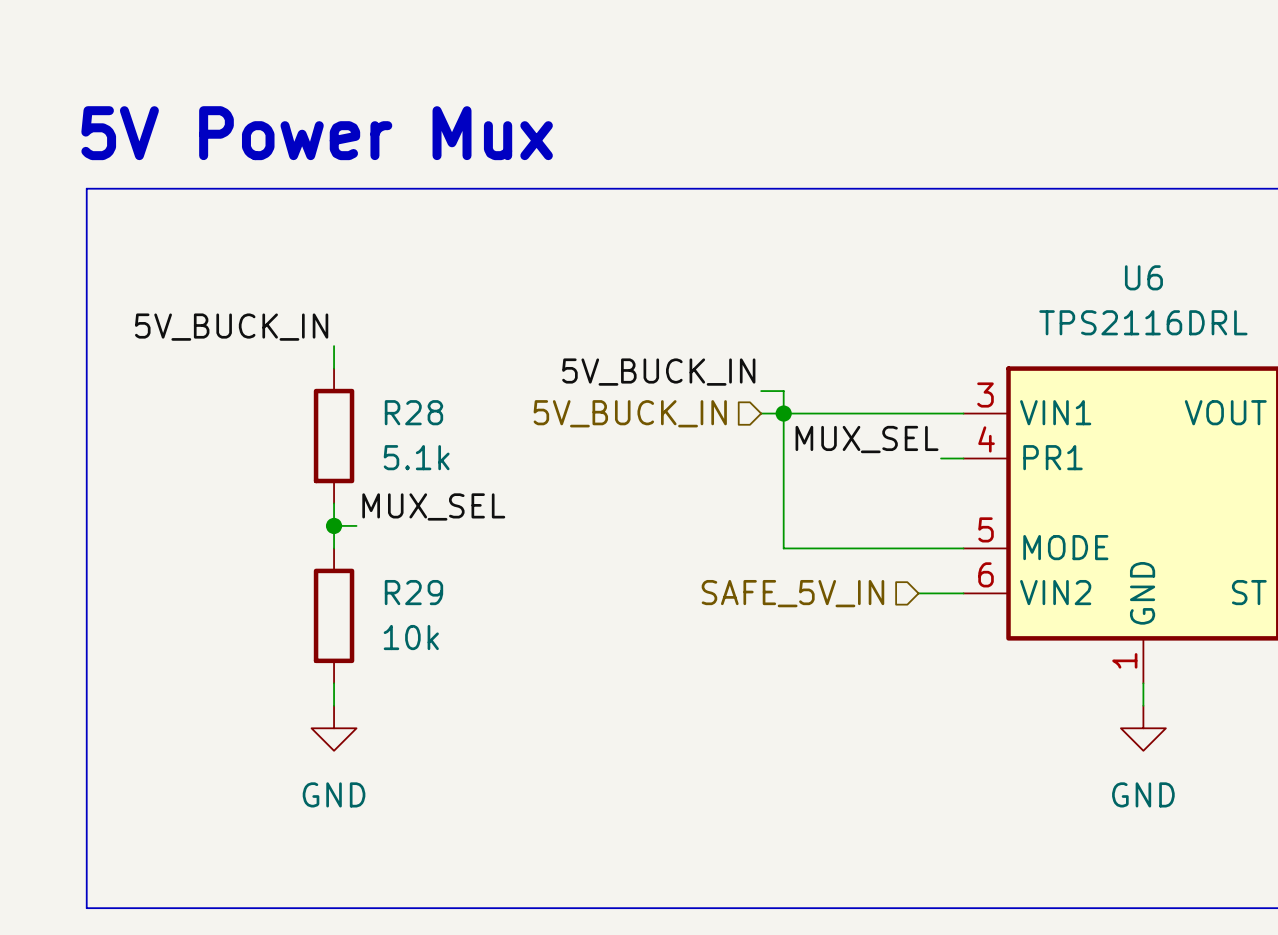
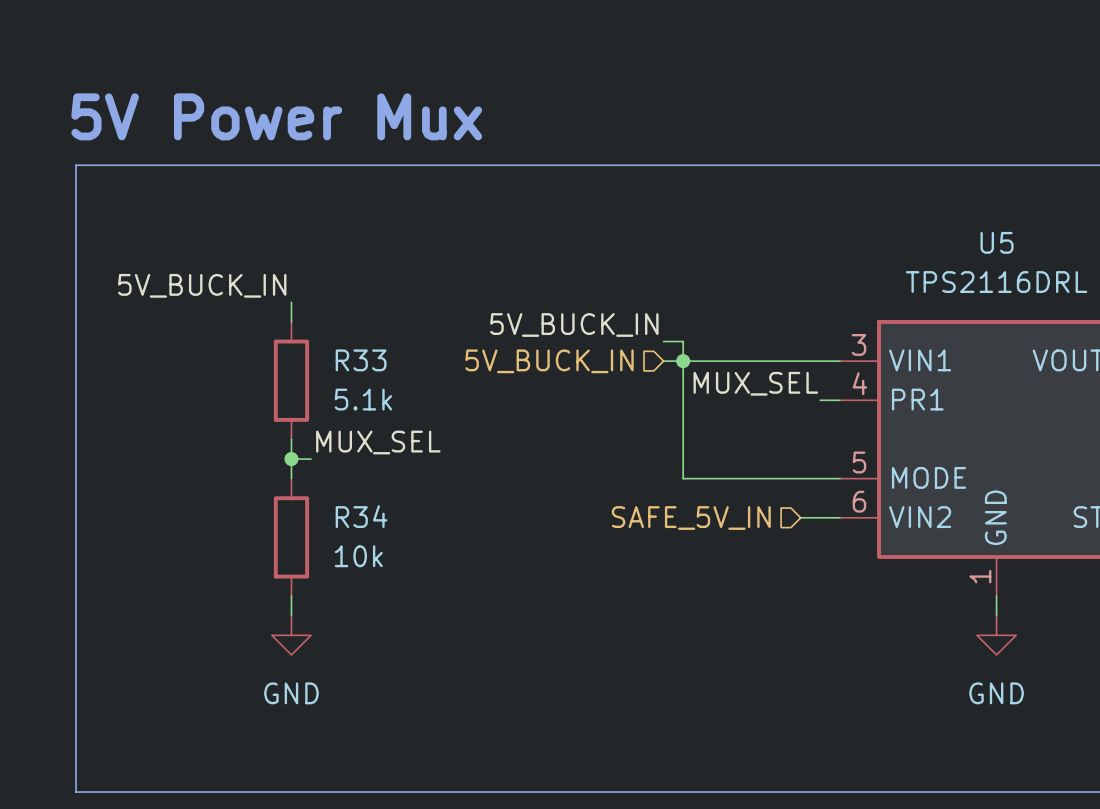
U6 name: U6 (1143, 277) -> U5 (997, 242)
R28 name: R28 (413, 412) -> R33 (361, 360)
R29 name: R29 (413, 592) -> R34 (361, 516)

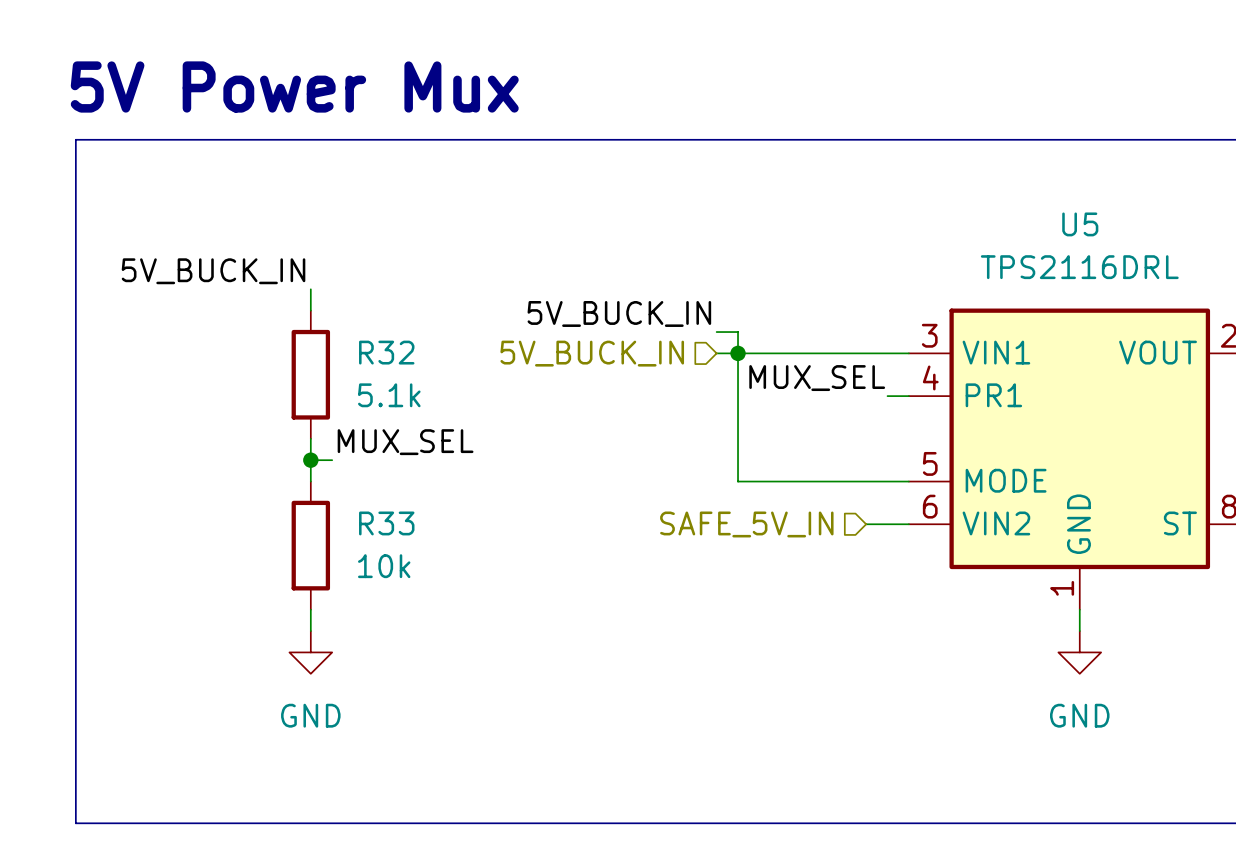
R33 name: R33 (361, 360) -> R32 (386, 352)
R34 name: R34 (361, 516) -> R33 (386, 523)

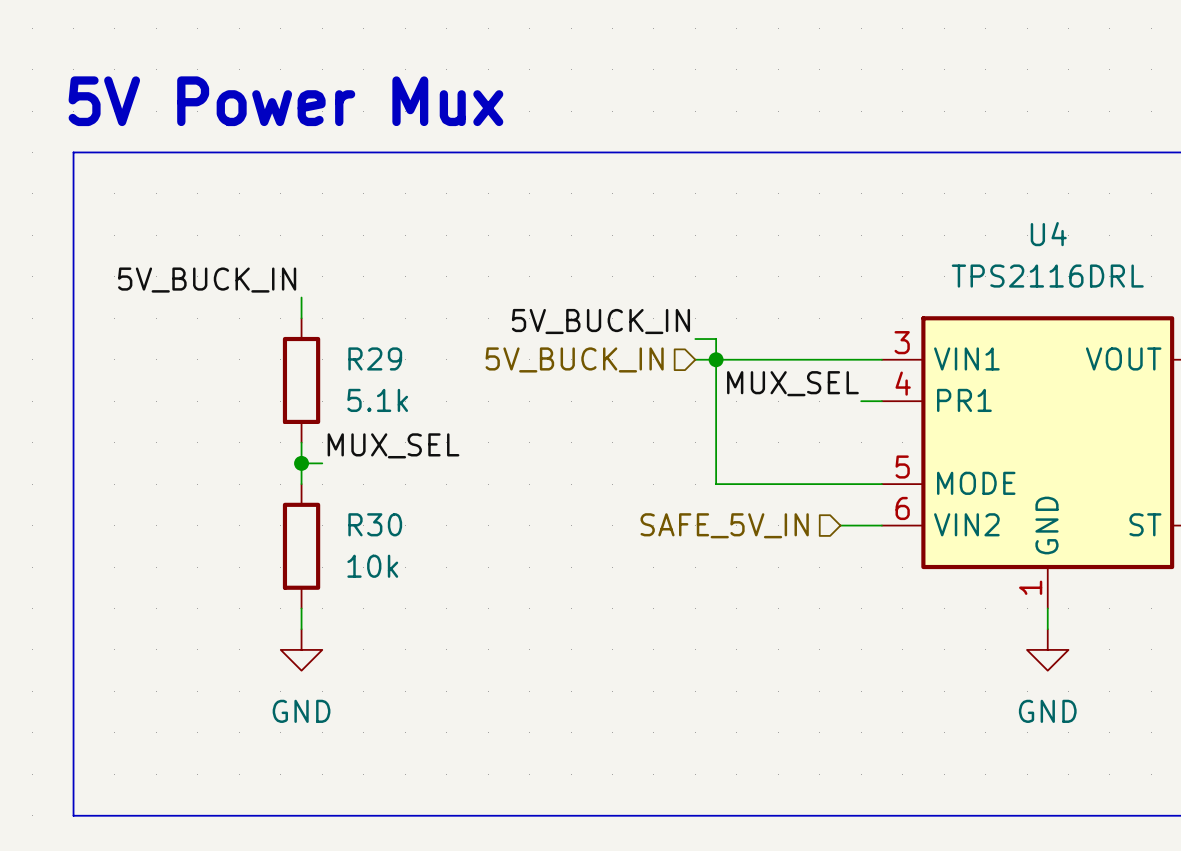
U5 name: U5 (1080, 224) -> U4 (1048, 234)
R32 name: R32 (386, 352) -> R29 (375, 358)
R33 name: R33 (386, 523) -> R30 (375, 524)

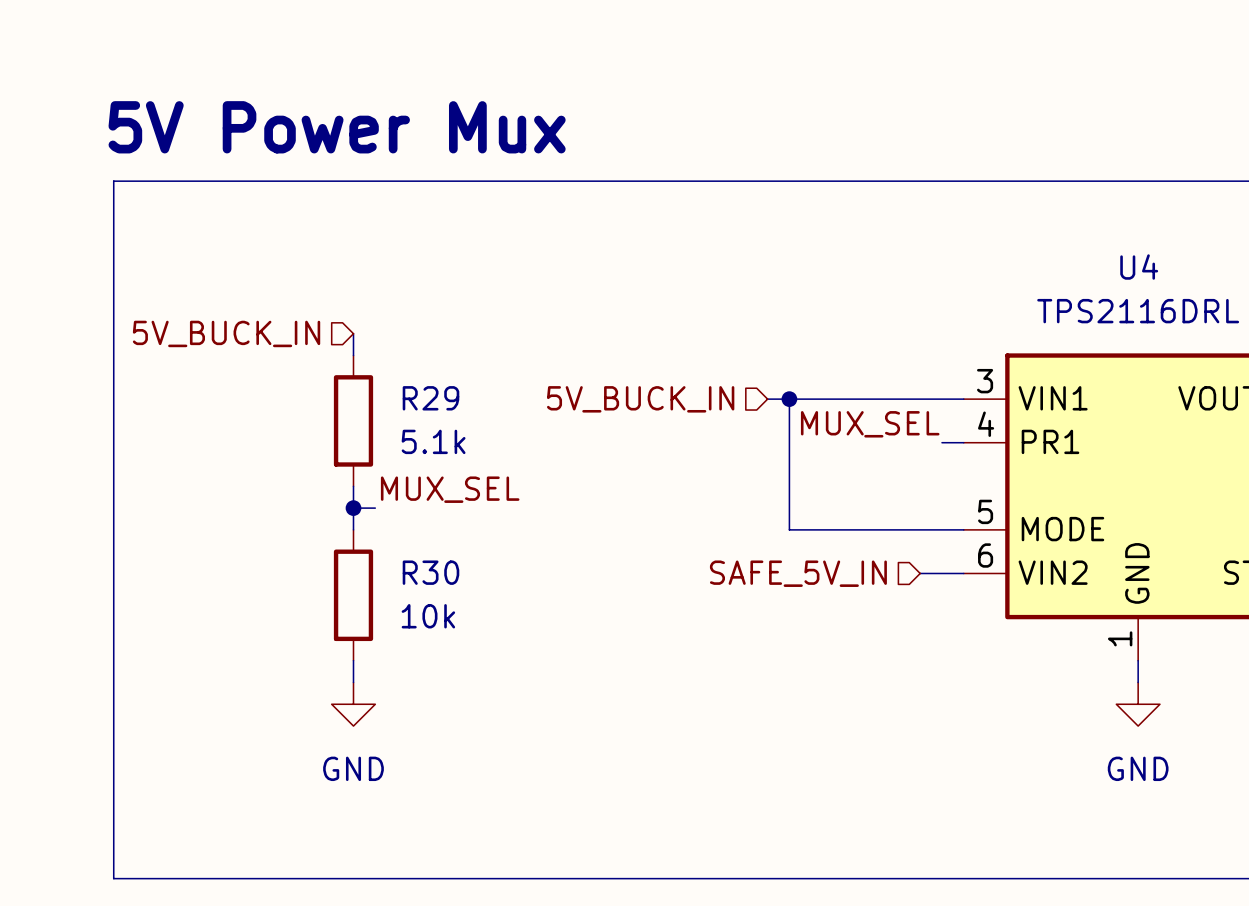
label: 5V_BUCK_IN (207, 280) -> none
hierarchical label: none -> 5V_BUCK_IN (226, 333)
label: 5V_BUCK_IN (600, 321) -> none
wire: (695, 339) (716, 339) (716, 359) -> none

